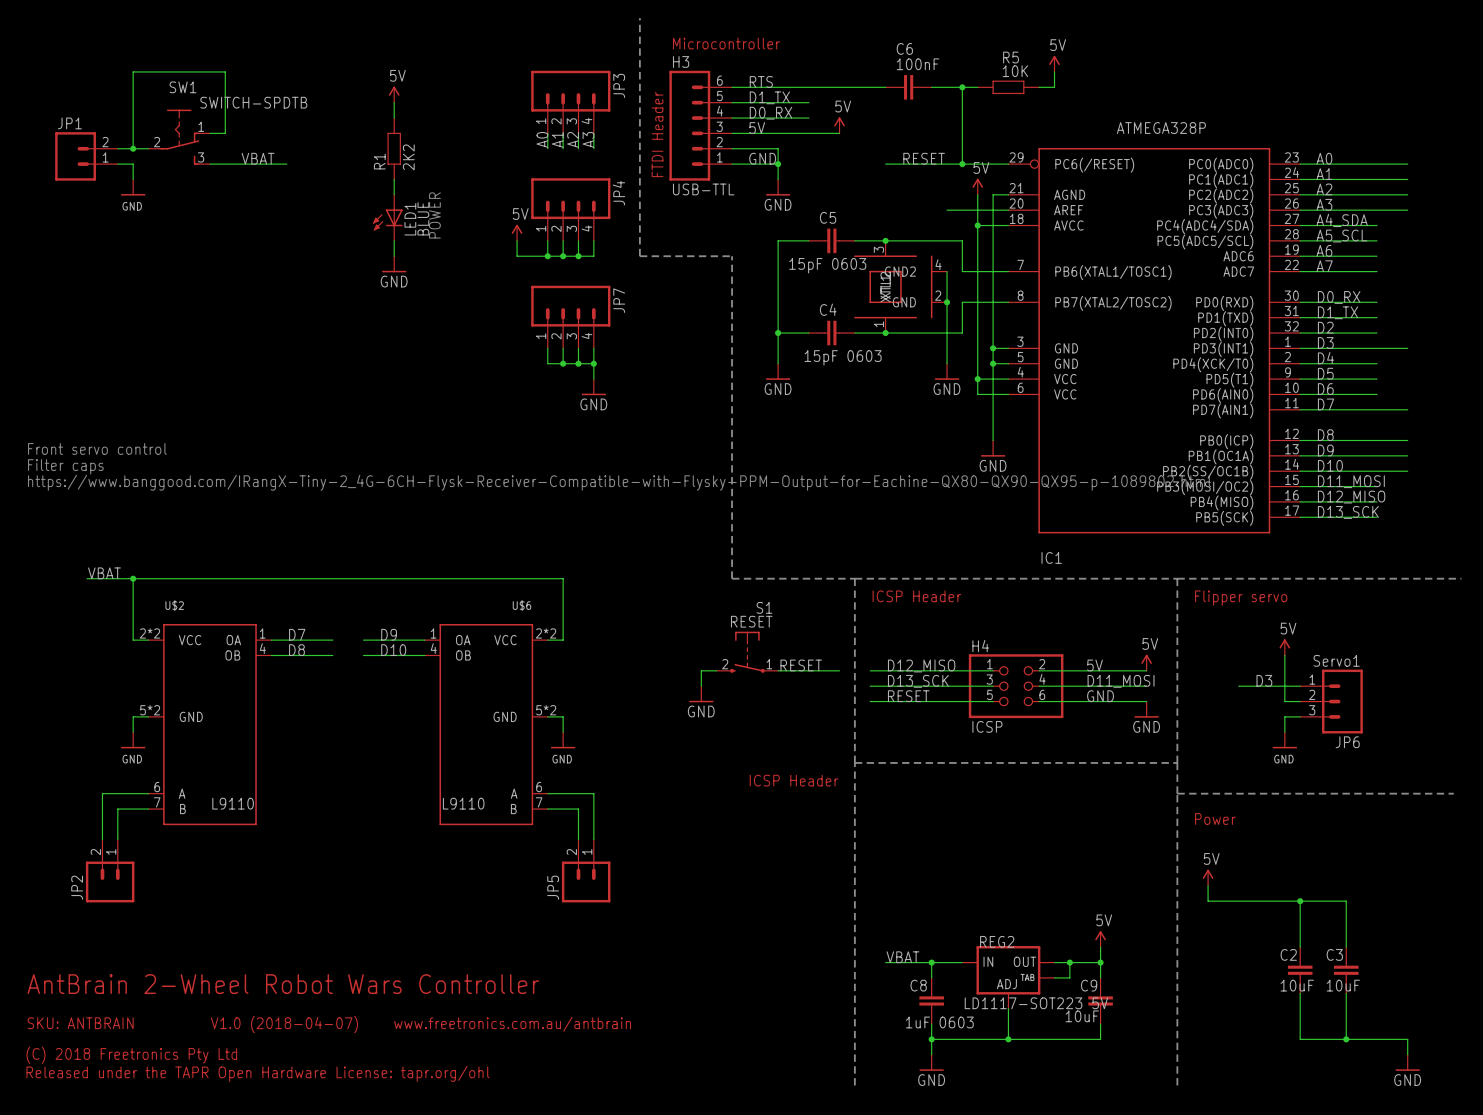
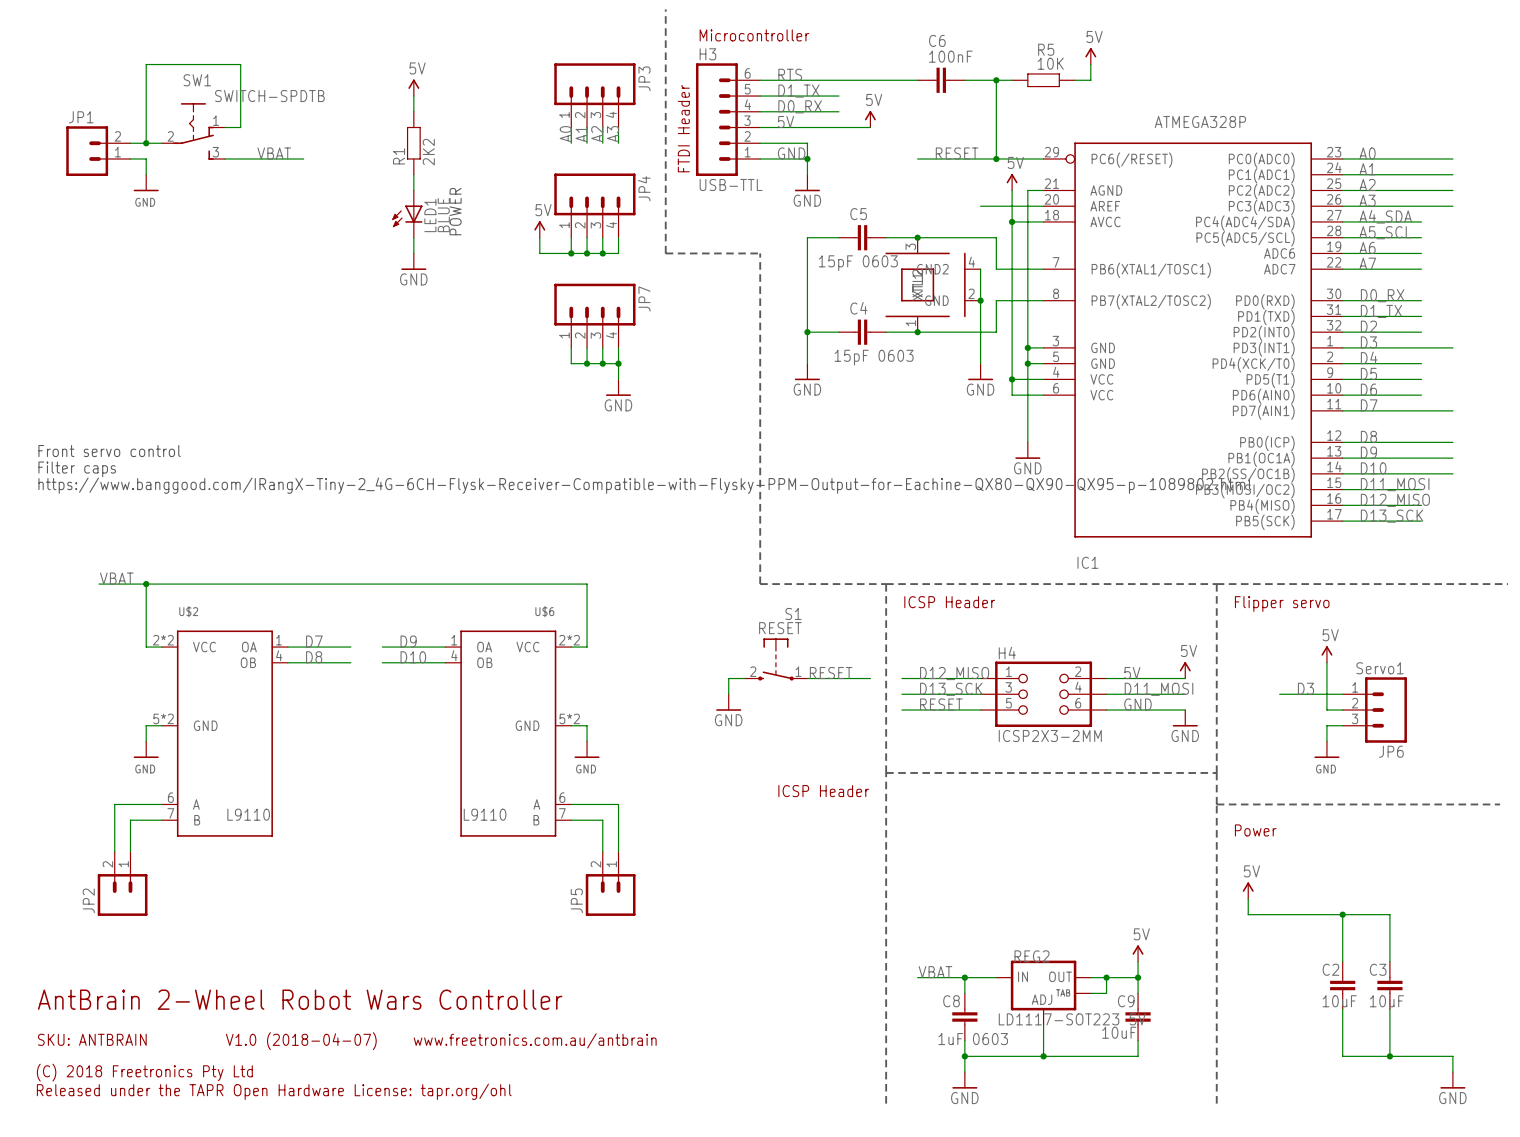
H4 symbol: [968, 654, 1064, 719] -> [980, 661, 1107, 728]
H4 value: ICSP (987, 726) -> ICSP2X3-2MM (1050, 735)

